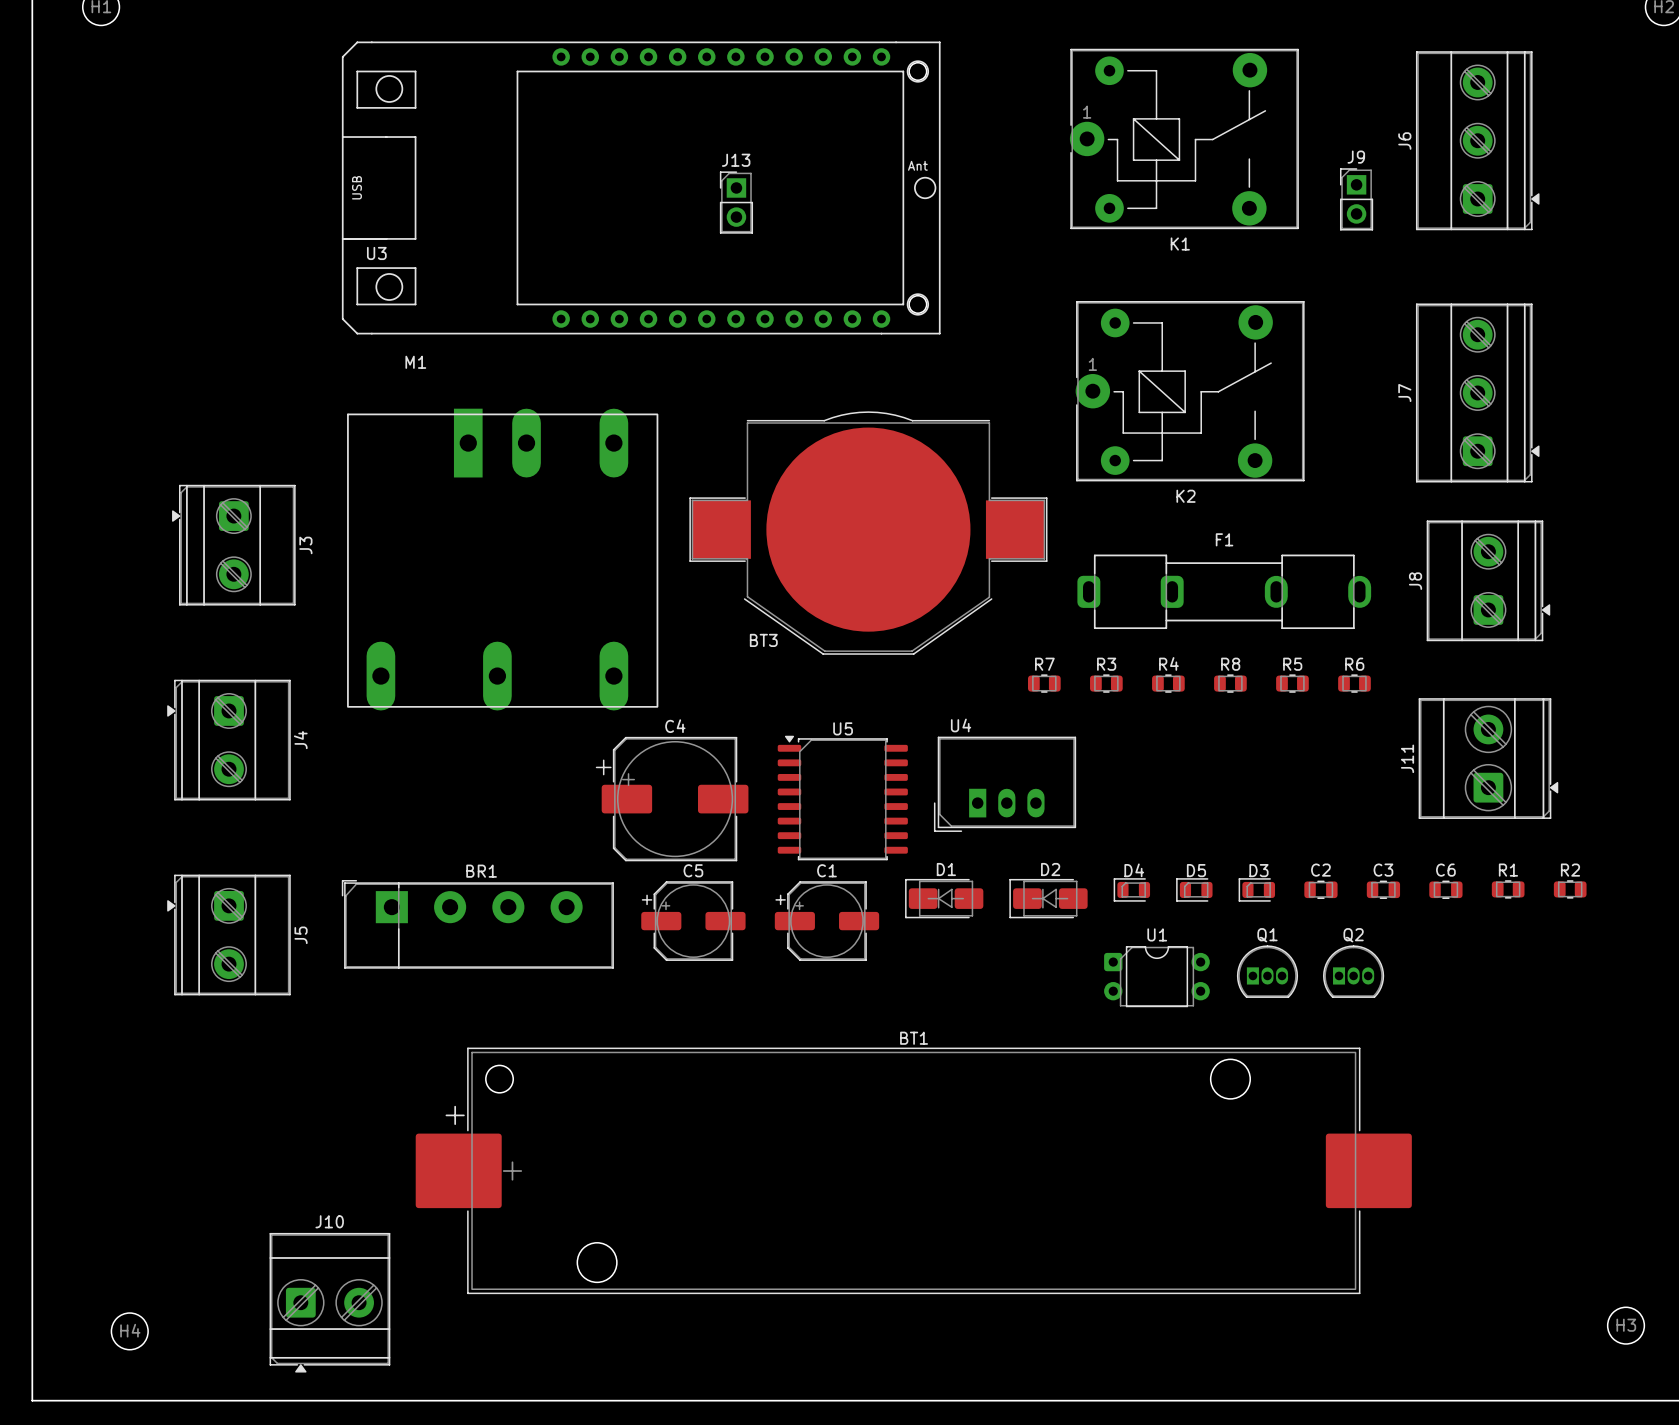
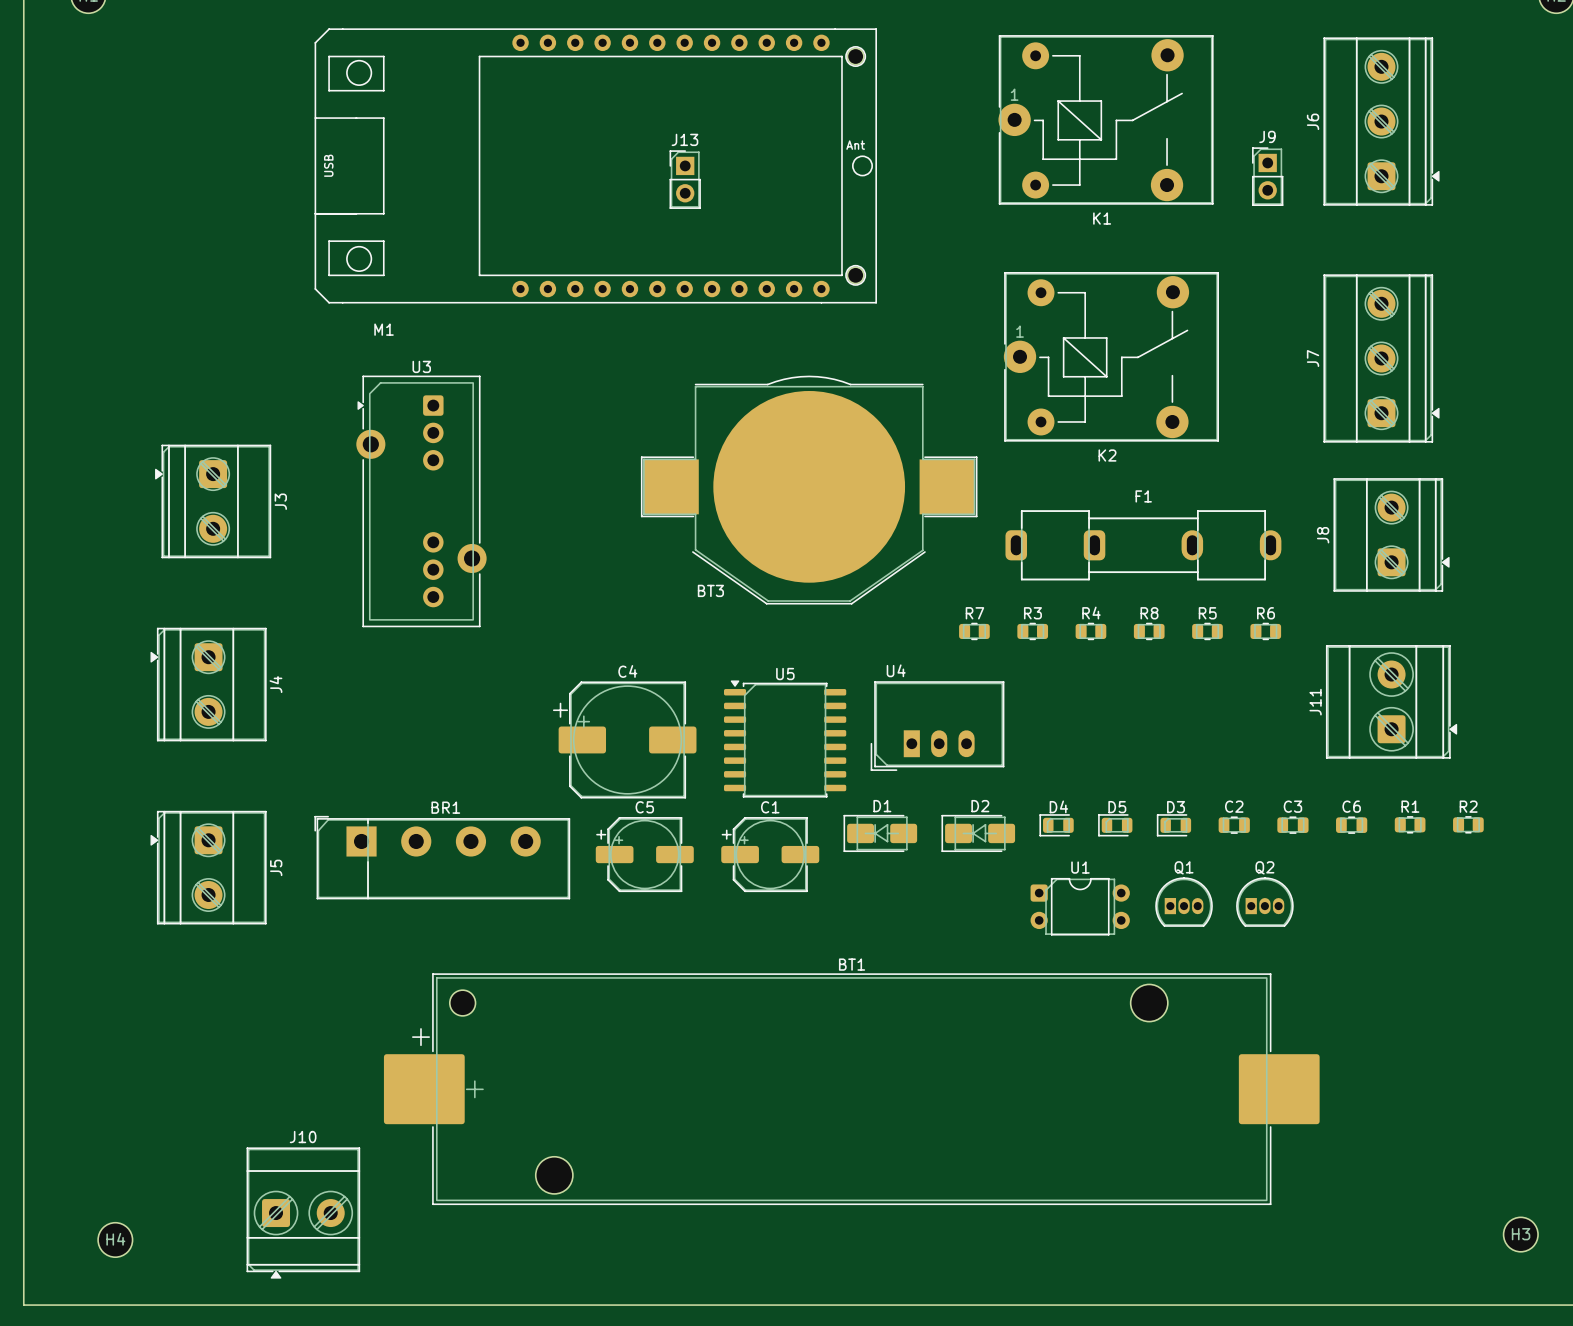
U3 name position: U3 (376, 253) -> U3 (421, 366)
U3 footprint: [347, 408, 659, 711] -> [356, 375, 487, 628]

